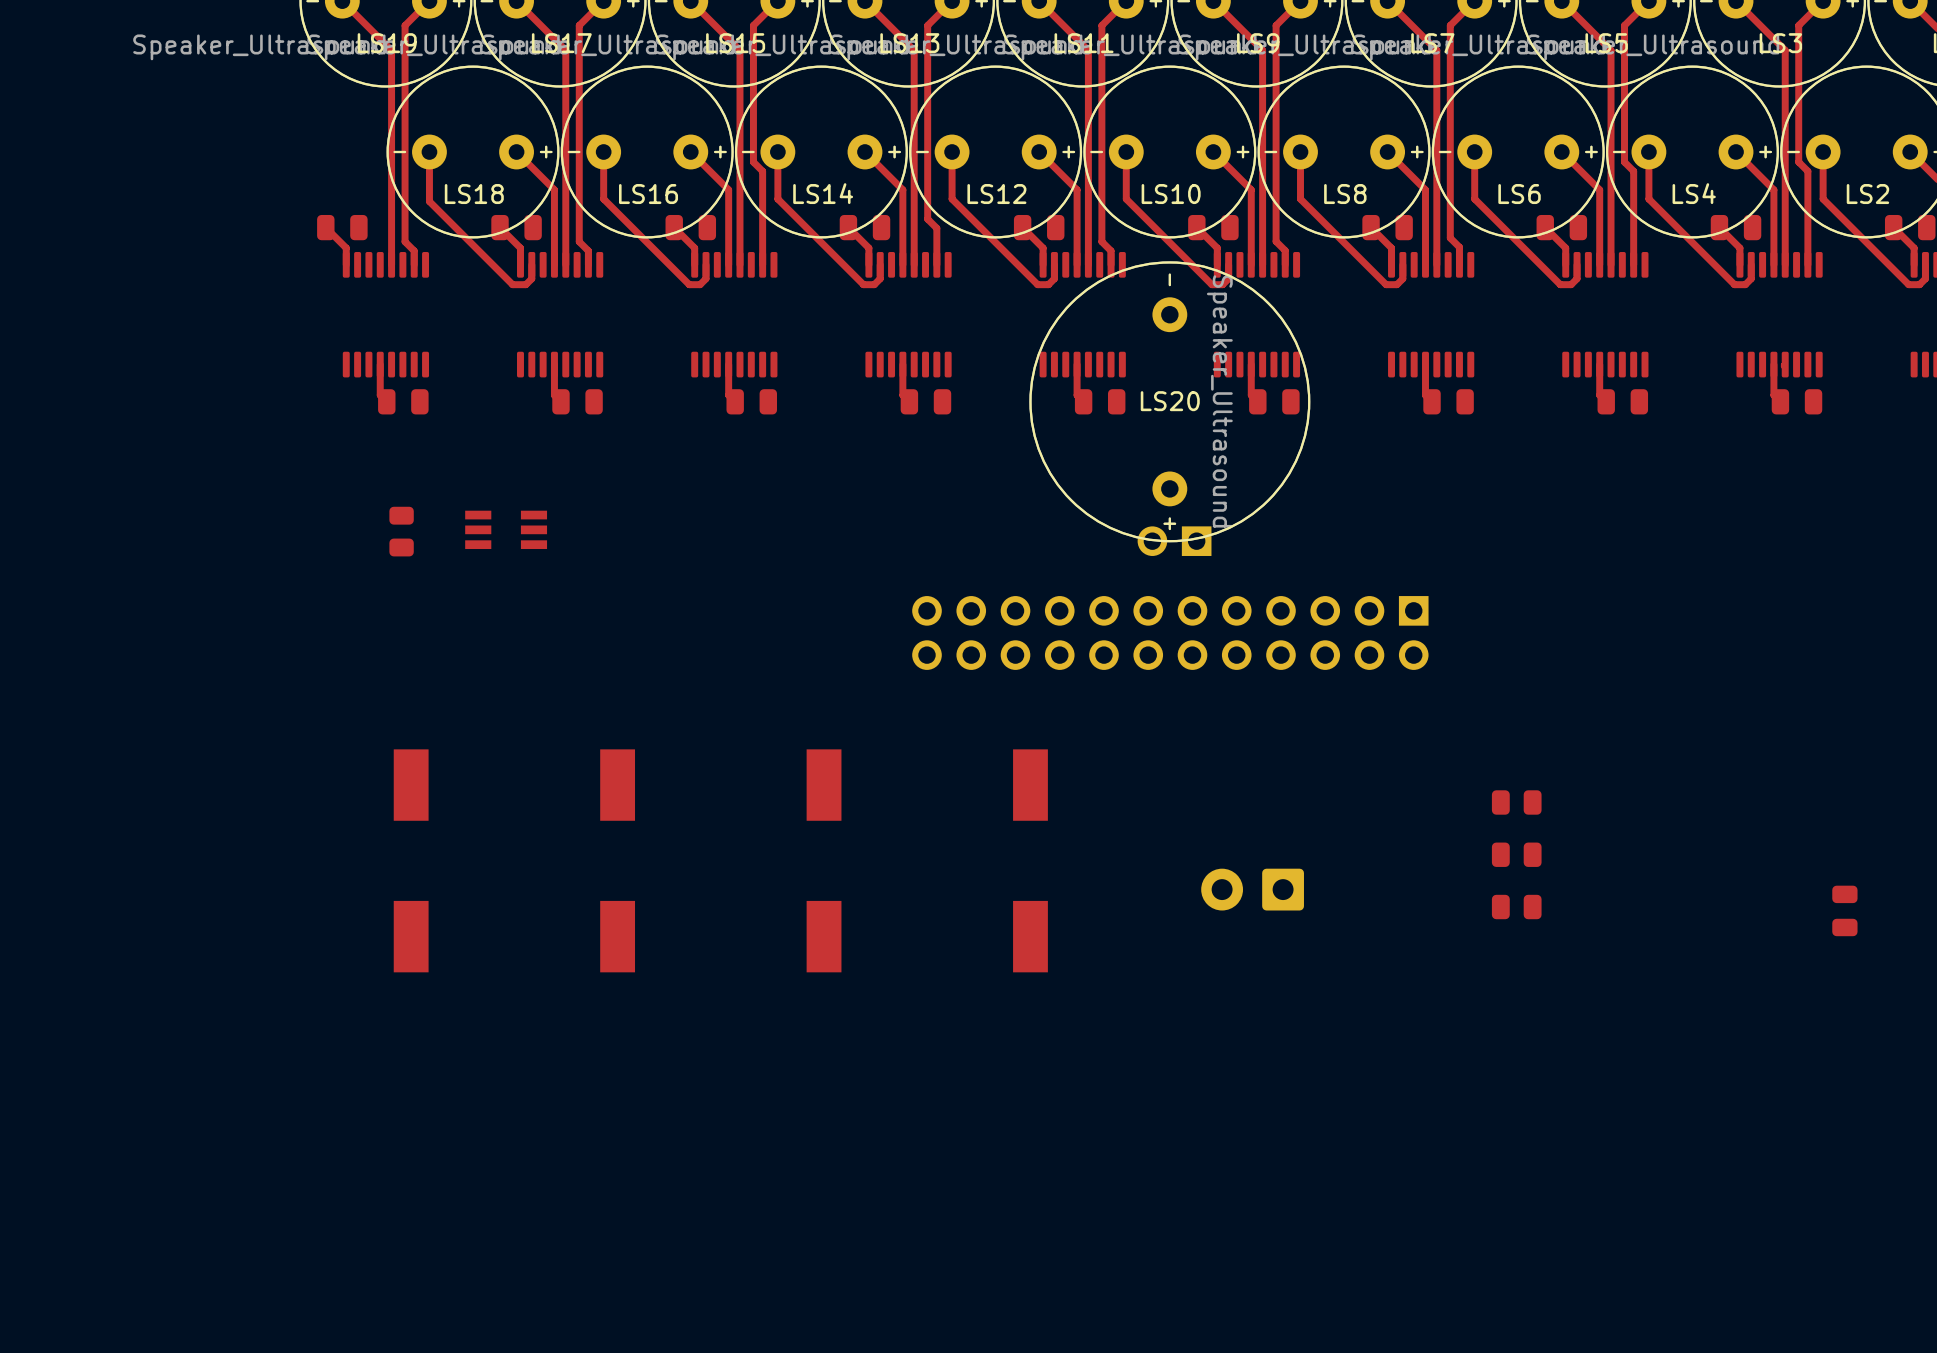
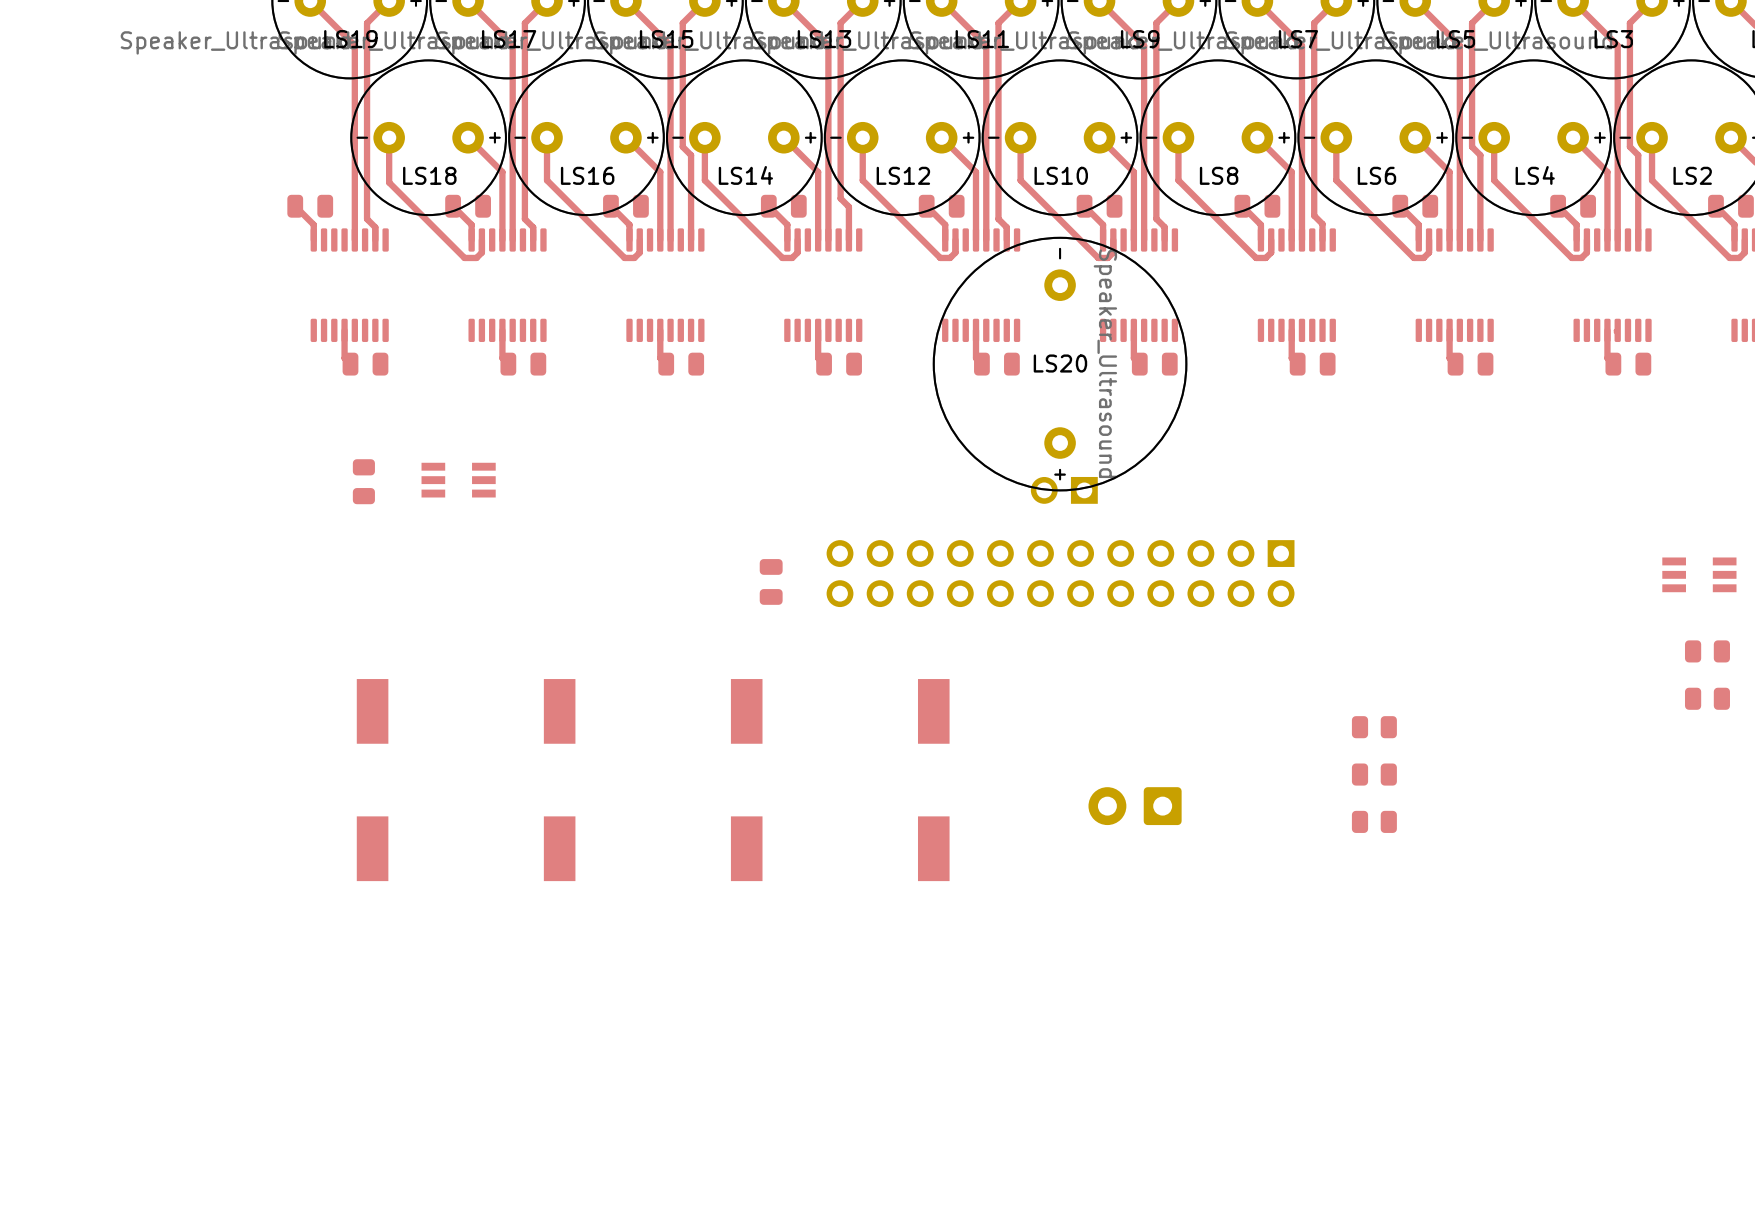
part: none -> (1699, 574)
part: none -> (771, 581)
part: none -> (1707, 651)
part: none -> (1707, 698)
part: (1844, 910) -> none

